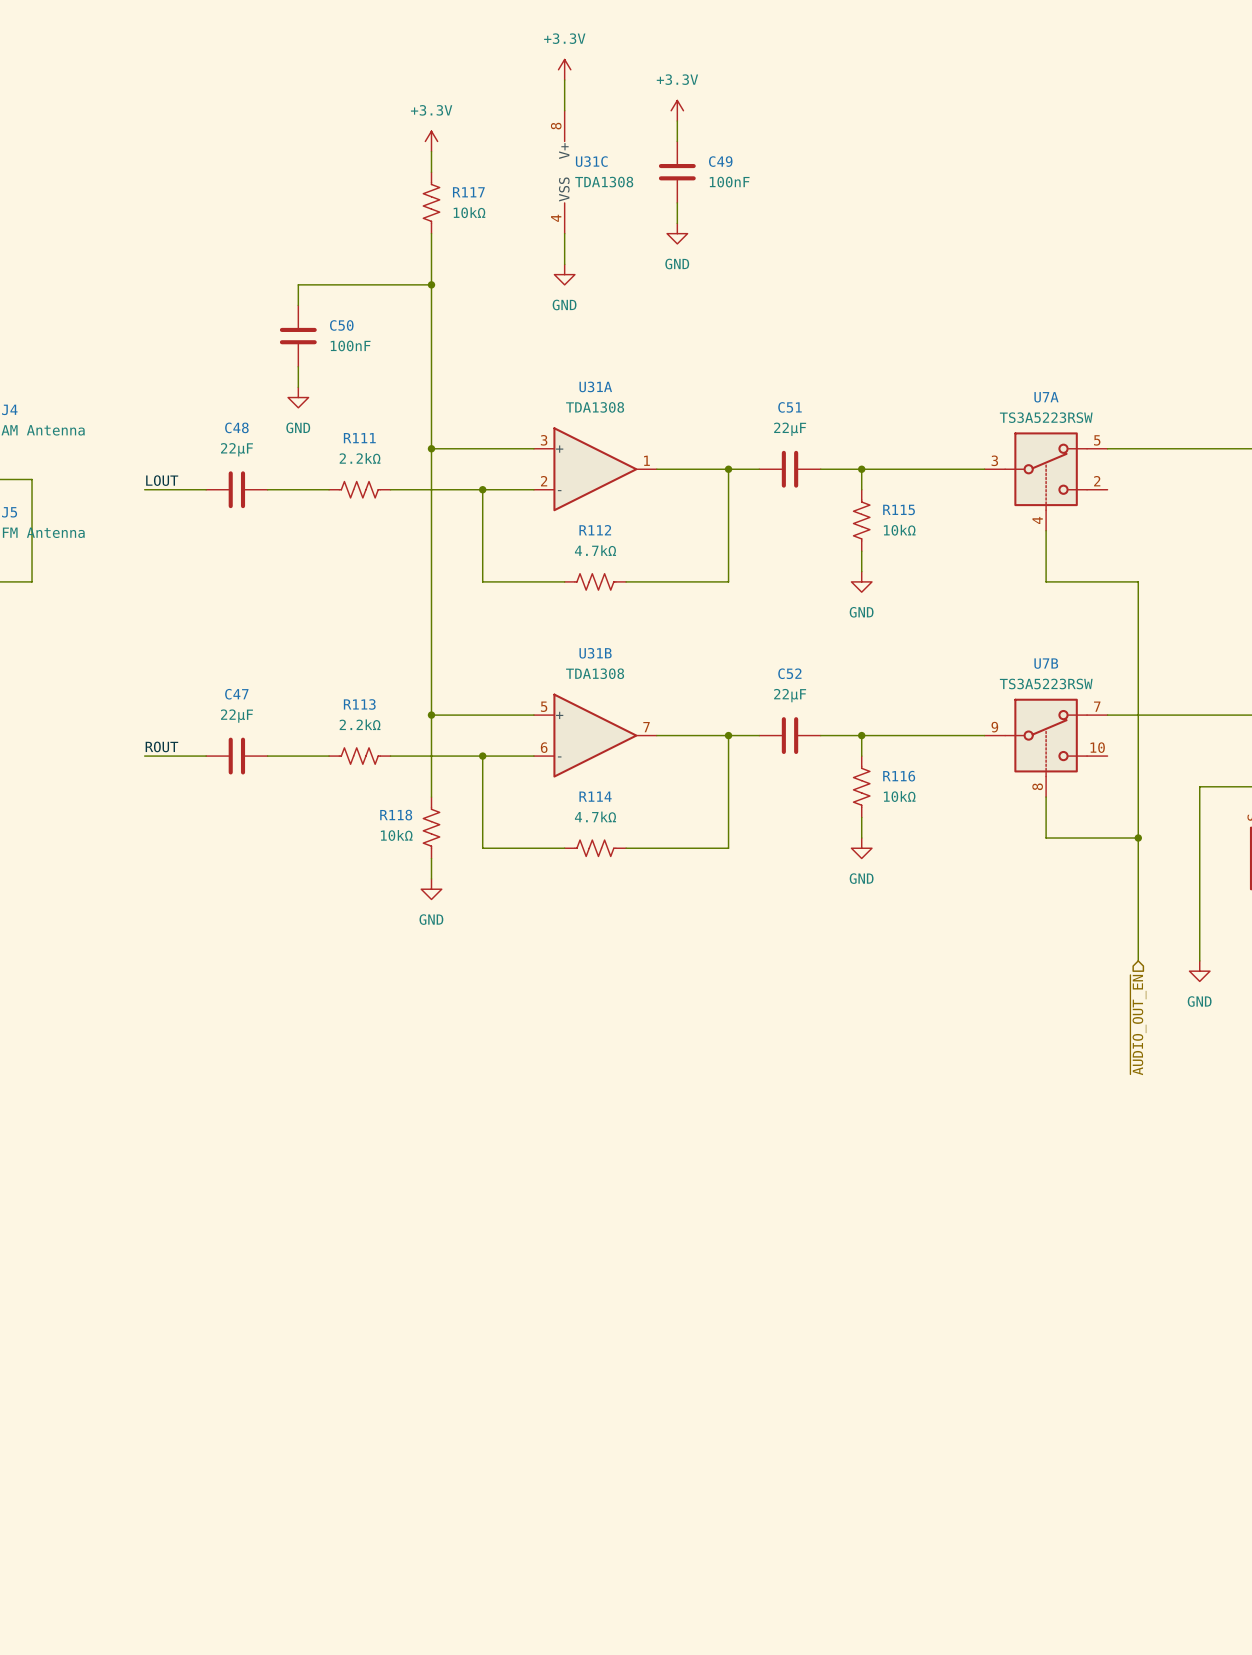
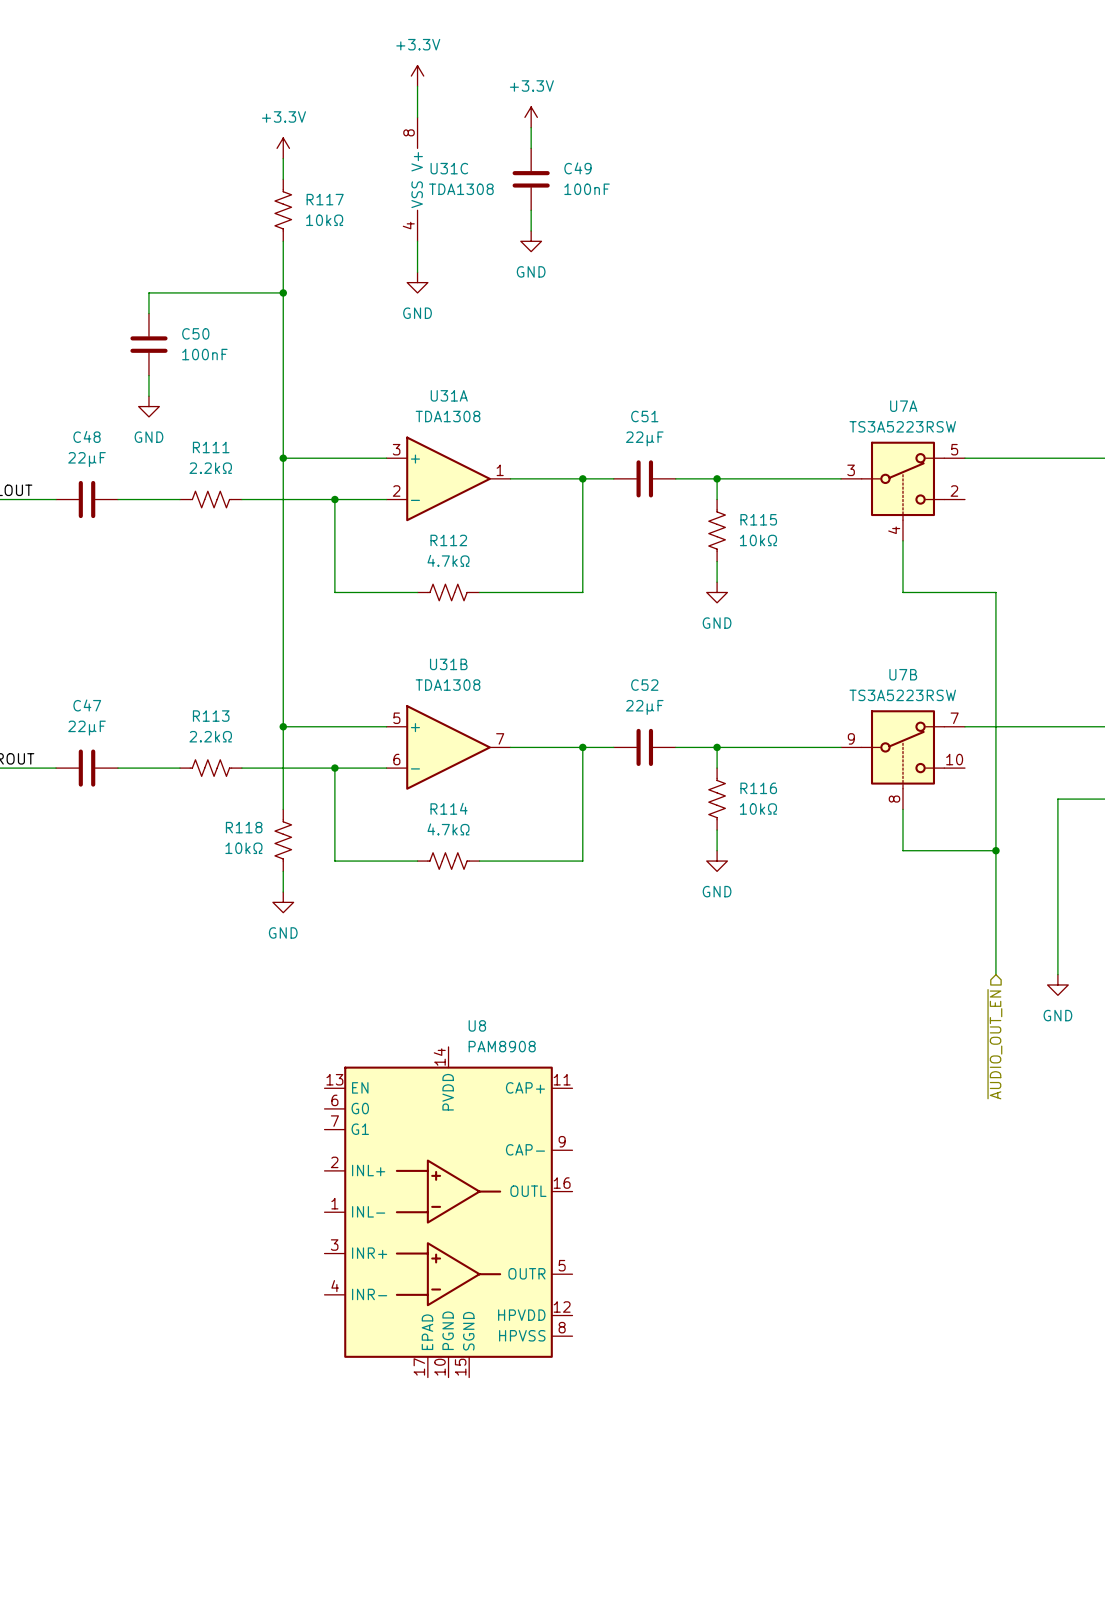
U8: none -> PAM8908 (448, 1212)

